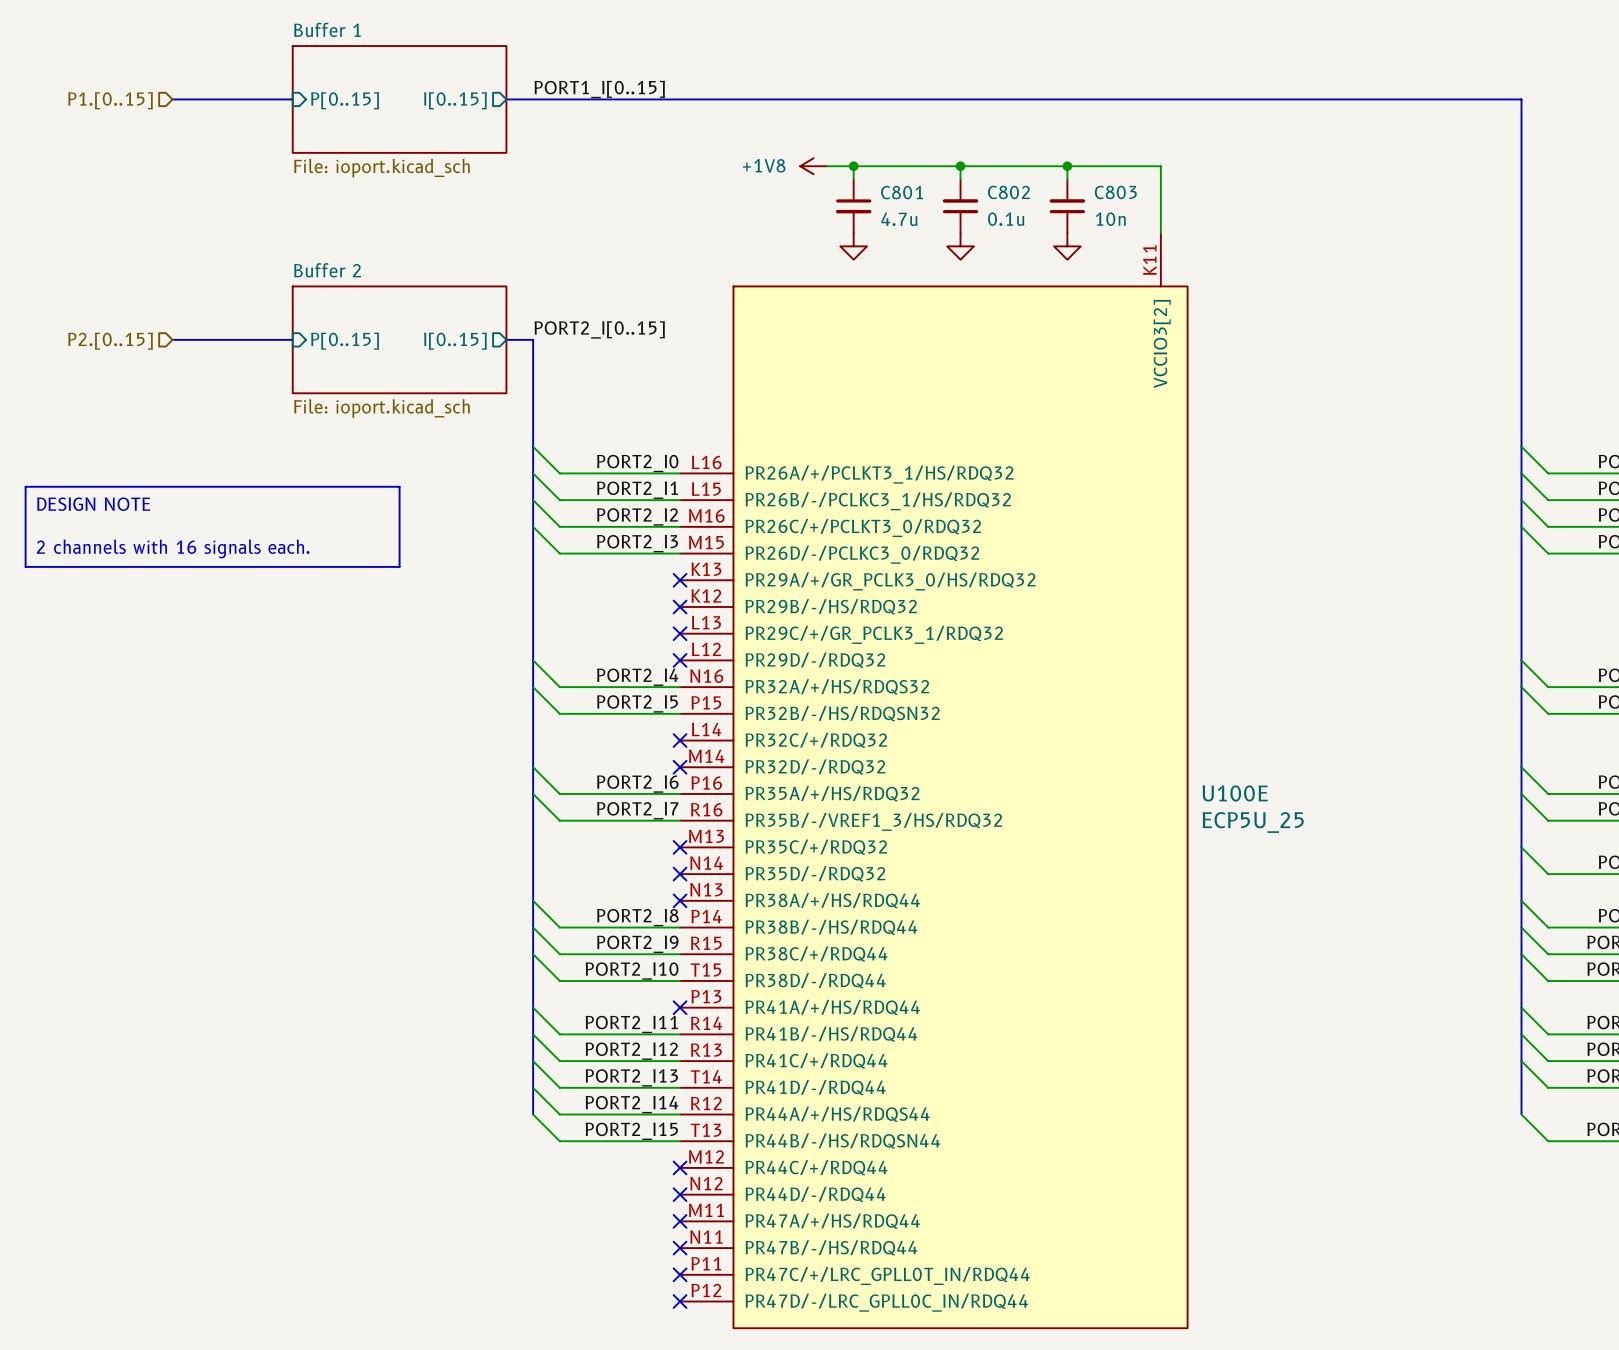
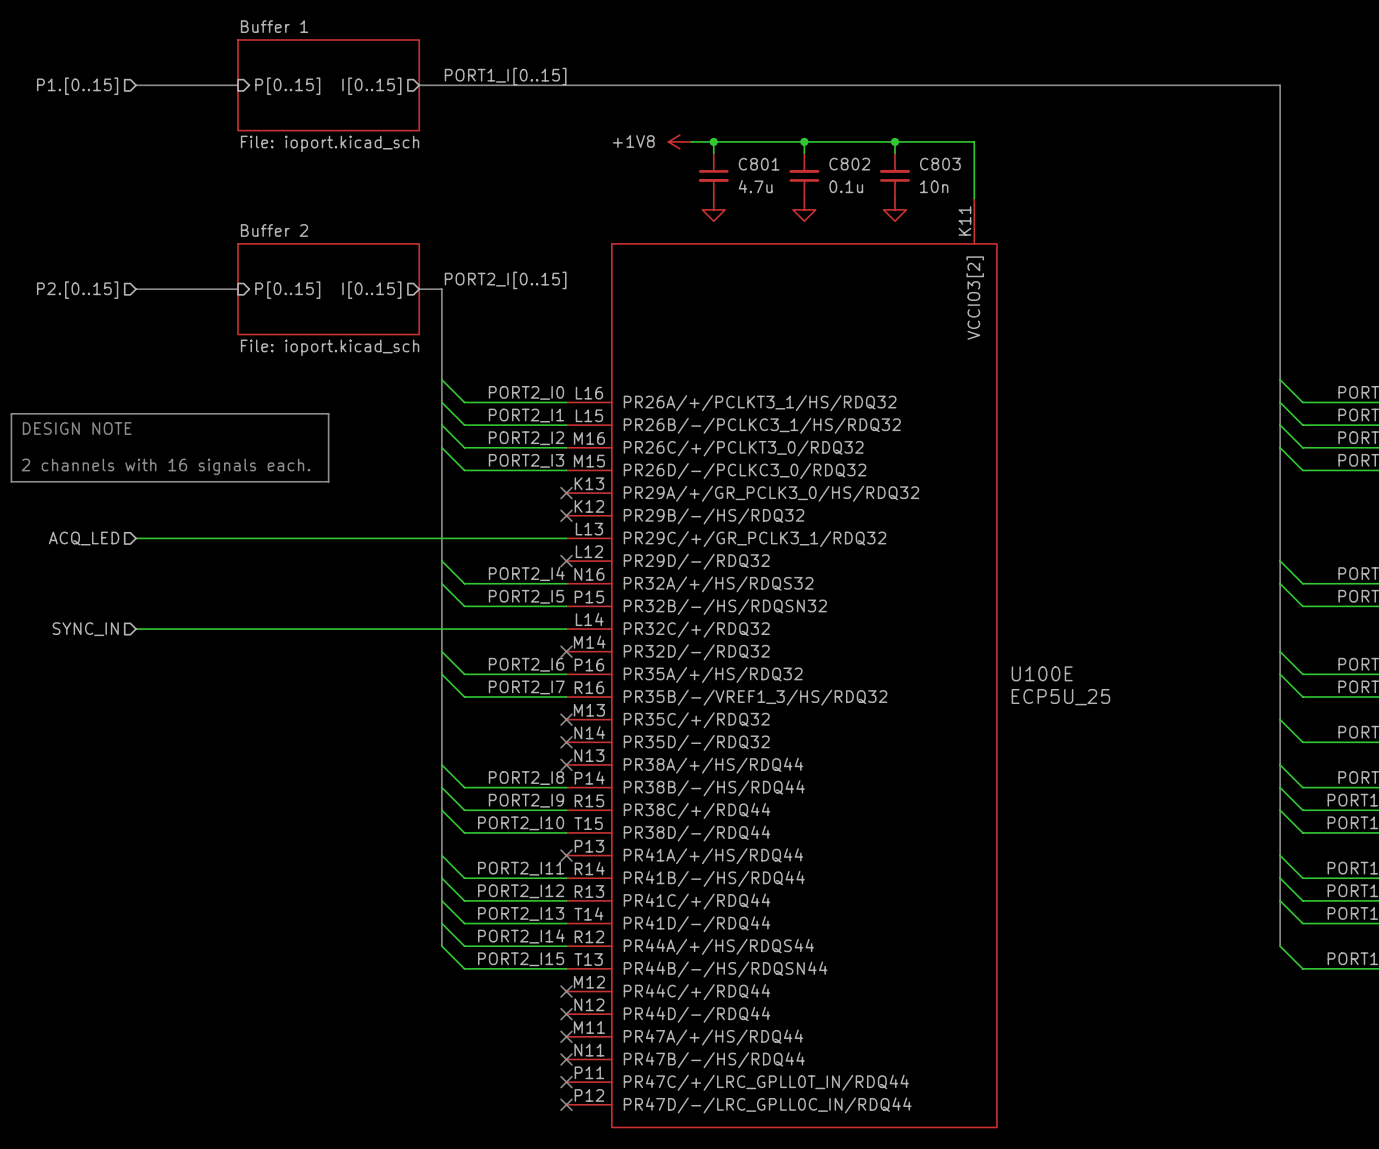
wire: none -> (136, 538) (566, 538)
no-connect mark: (680, 633) -> none
hierarchical label: none -> ACQ_LED (84, 538)
wire: none -> (136, 629) (566, 629)
no-connect mark: (680, 740) -> none
hierarchical label: none -> SYNC_IN (85, 629)

